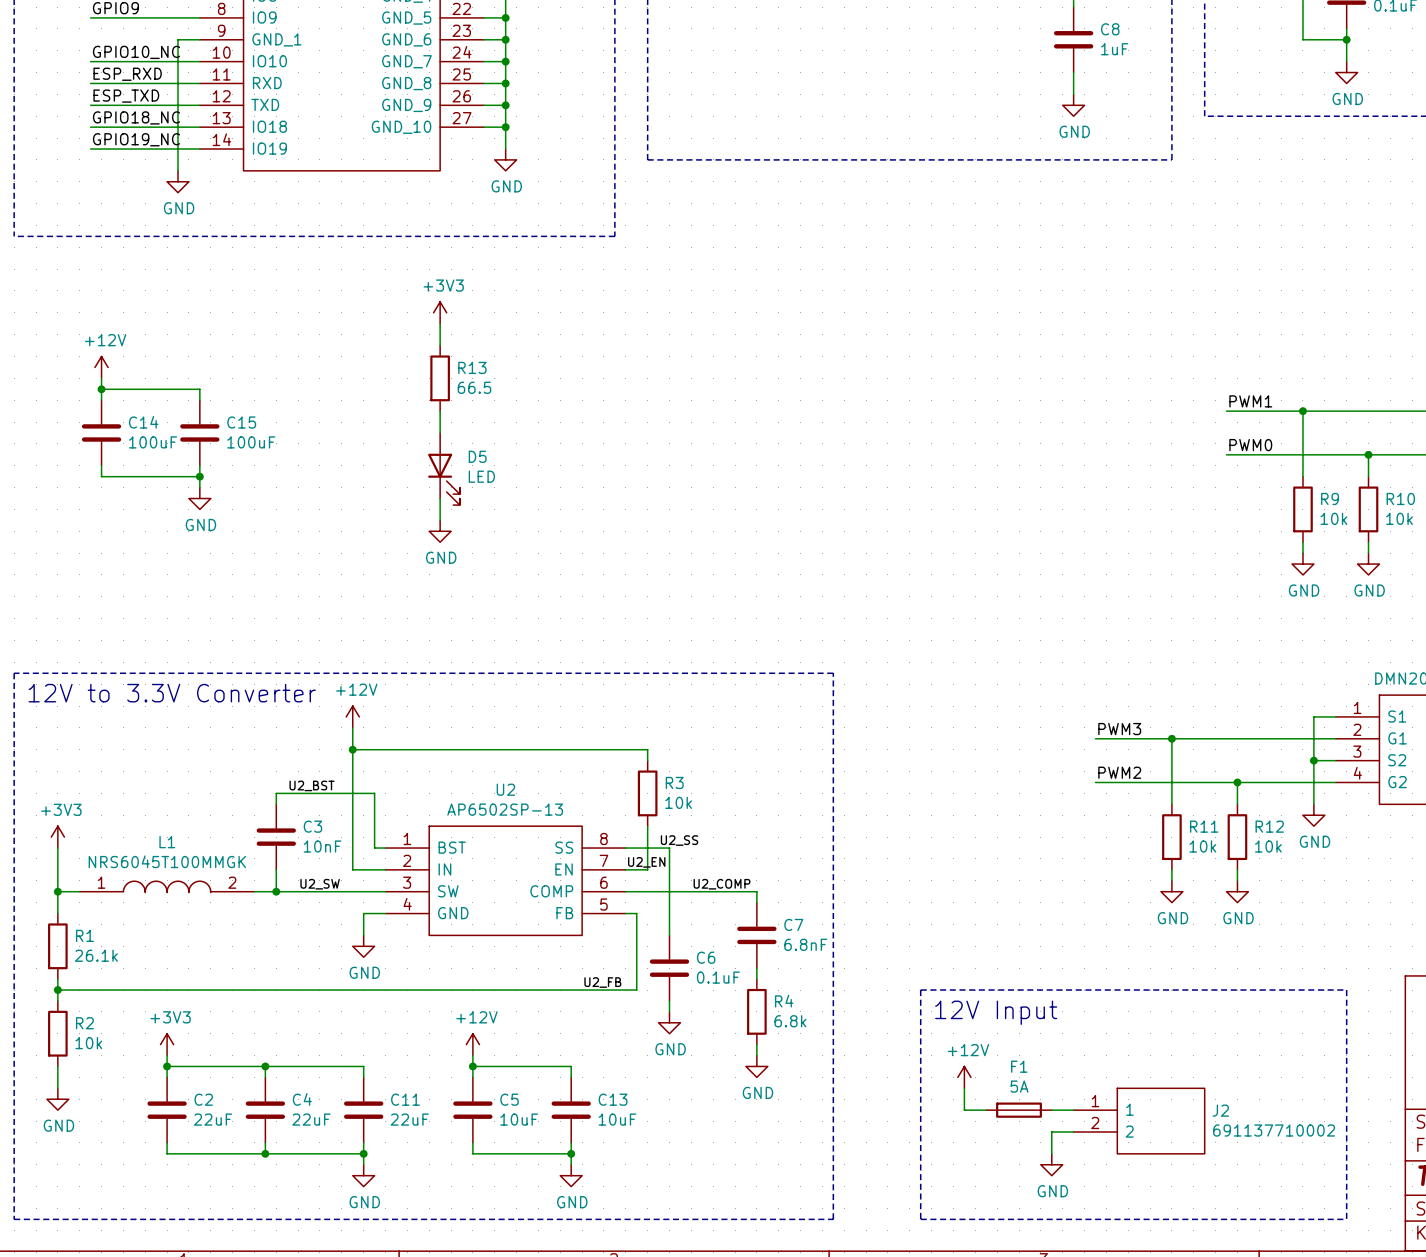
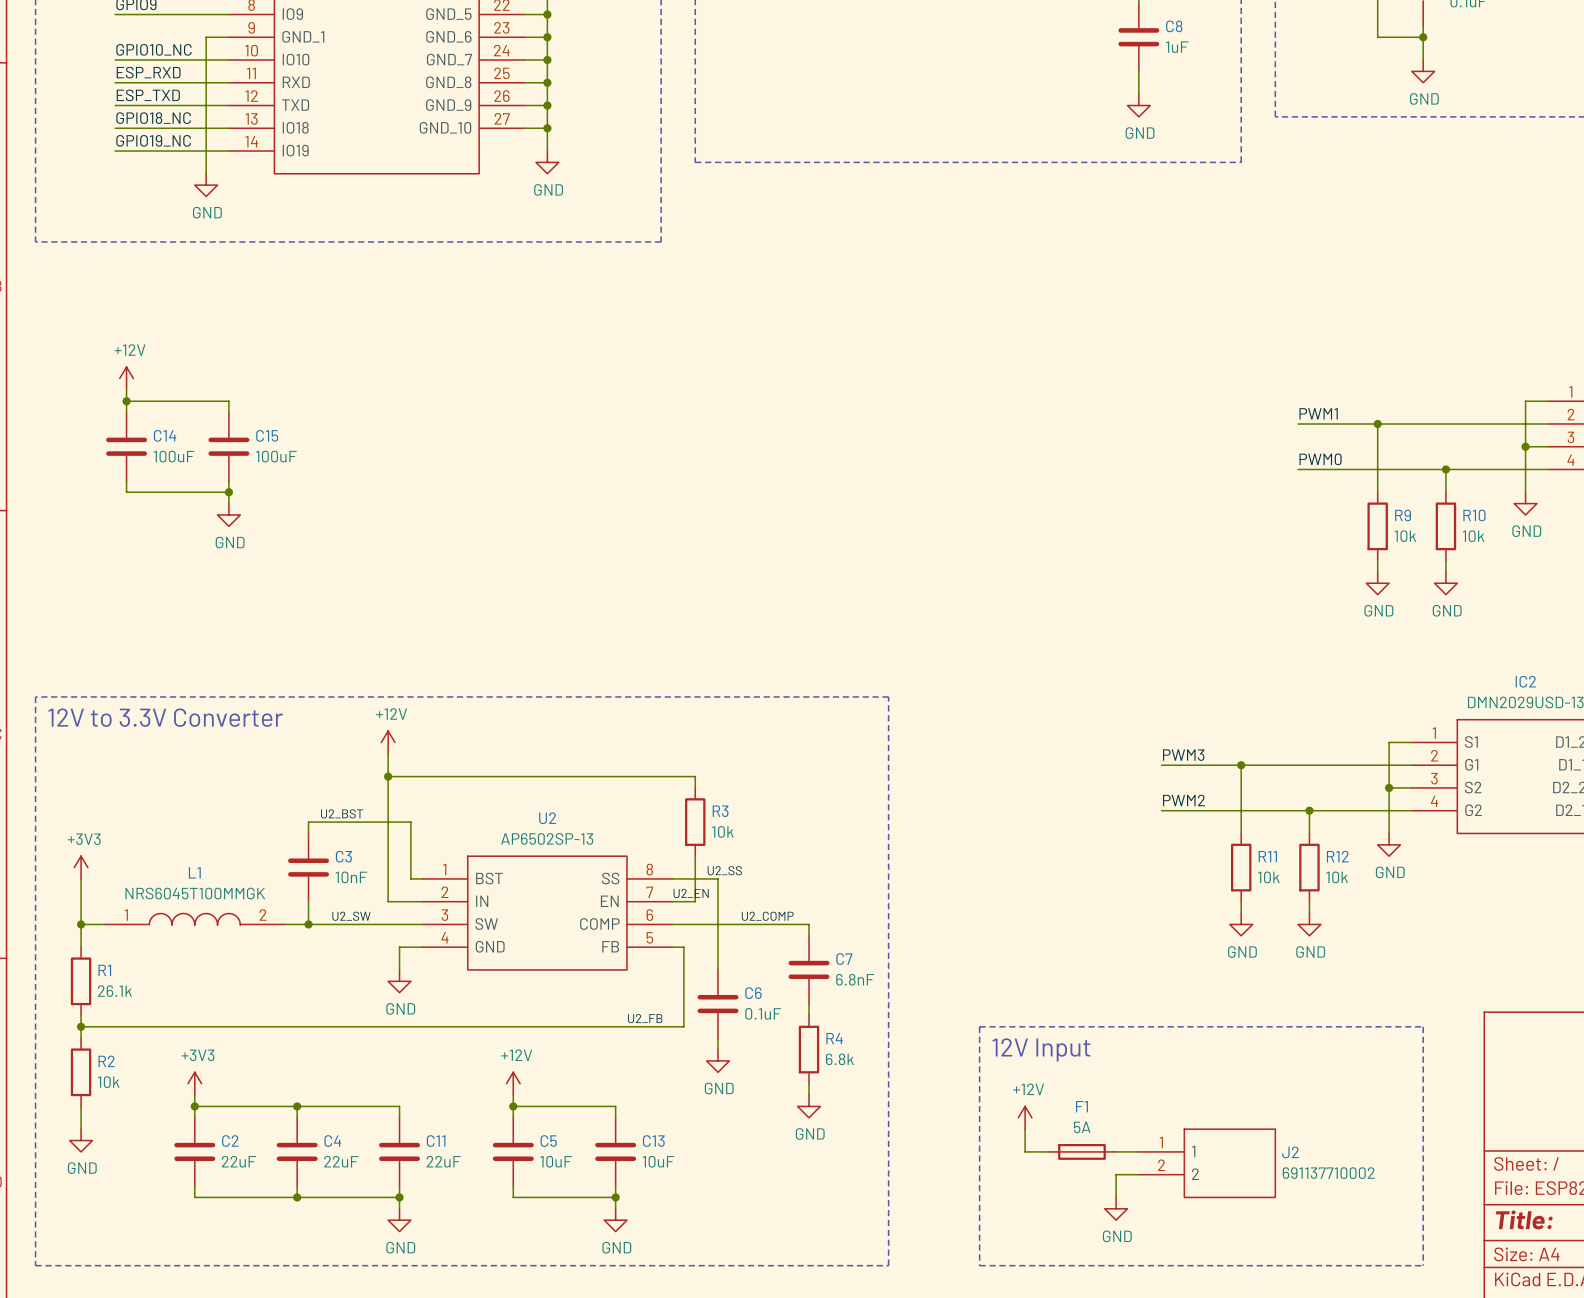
power symbol: +3V3 (440, 312) -> none
wire: (440, 323) (440, 345) -> none
R13: 66.5 (440, 378) -> none
wire: (440, 411) (440, 432) -> none
D5: LED (443, 469) -> none
wire: (440, 498) (440, 520) -> none
power symbol: GND (440, 531) -> none

